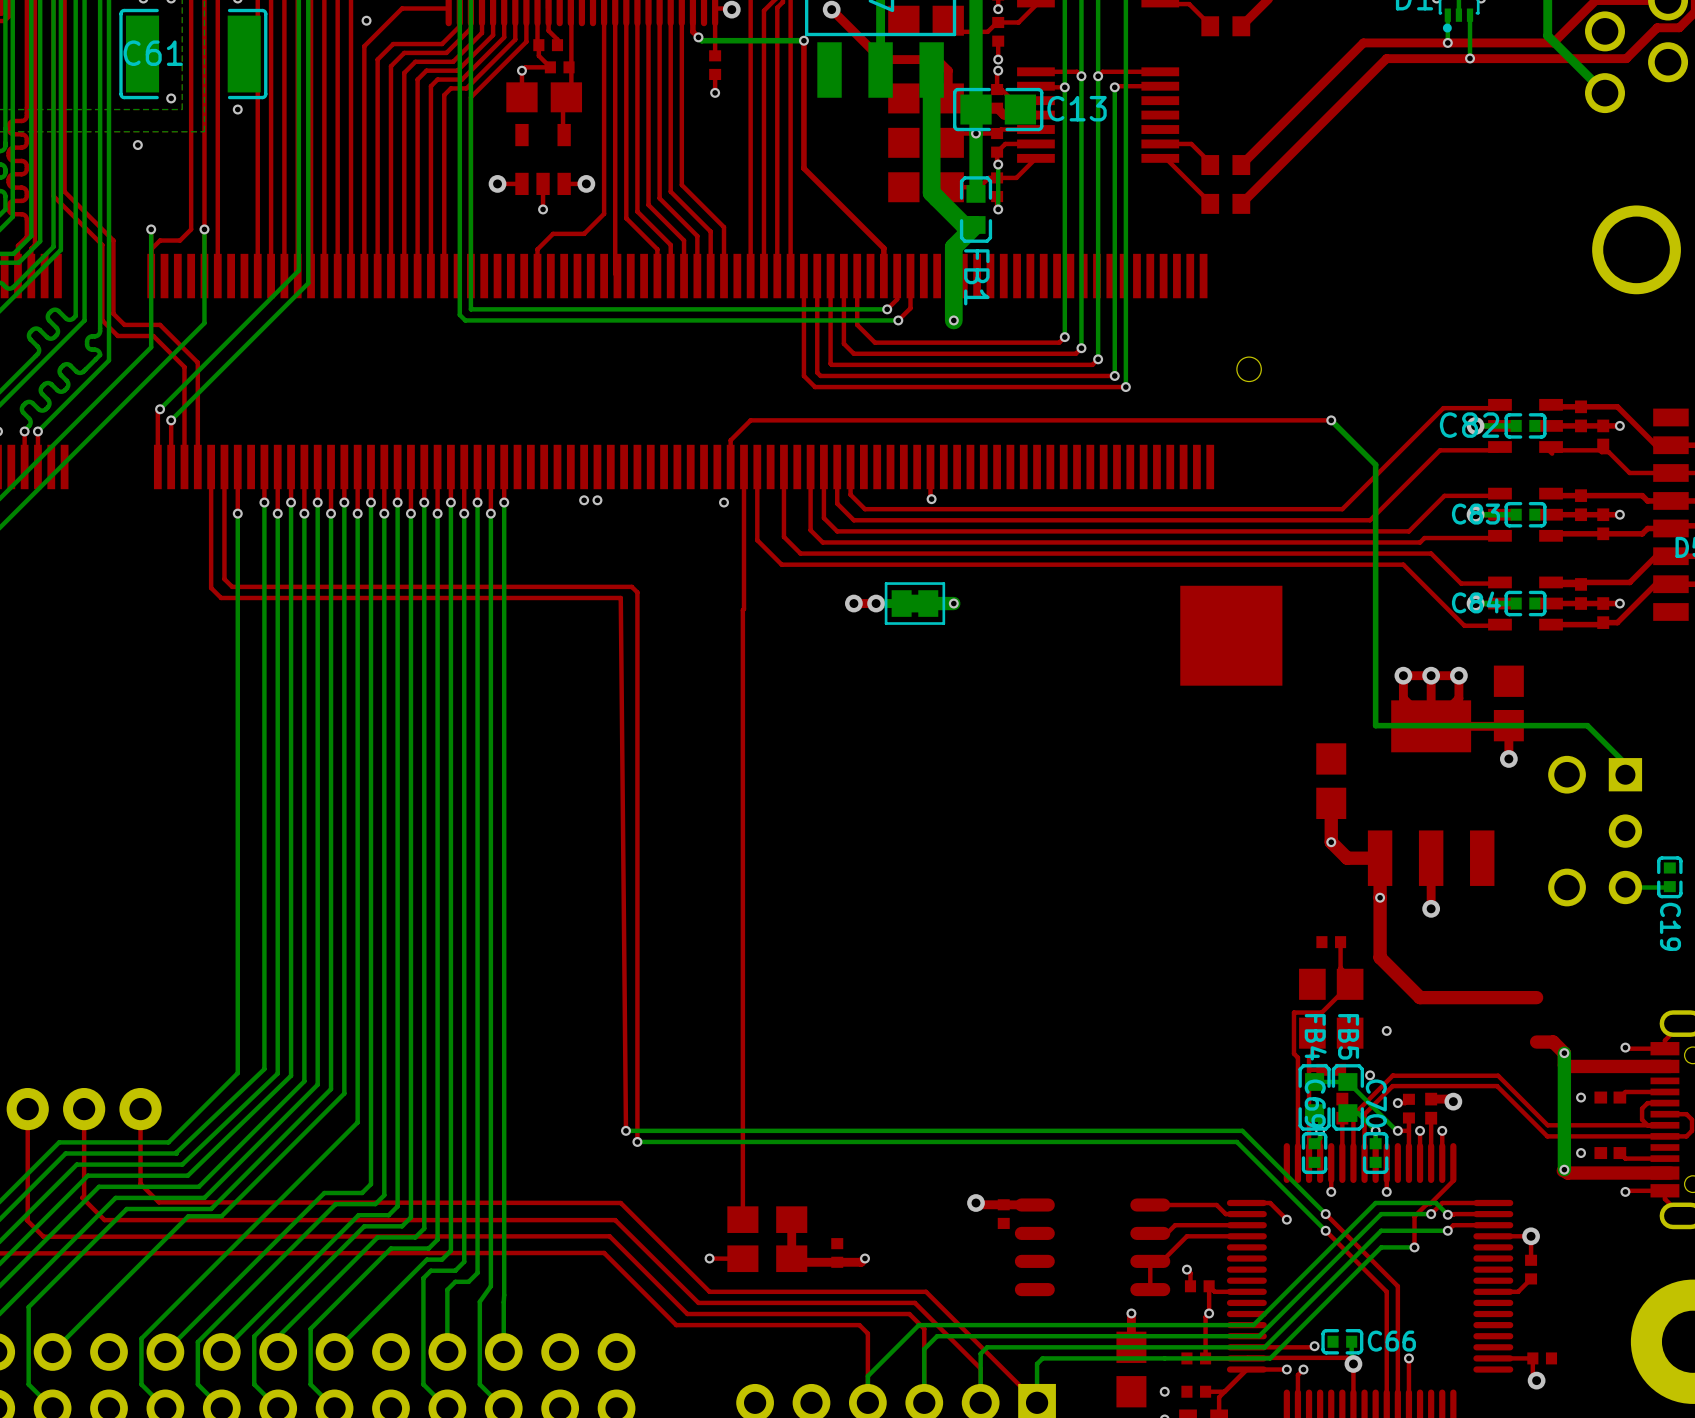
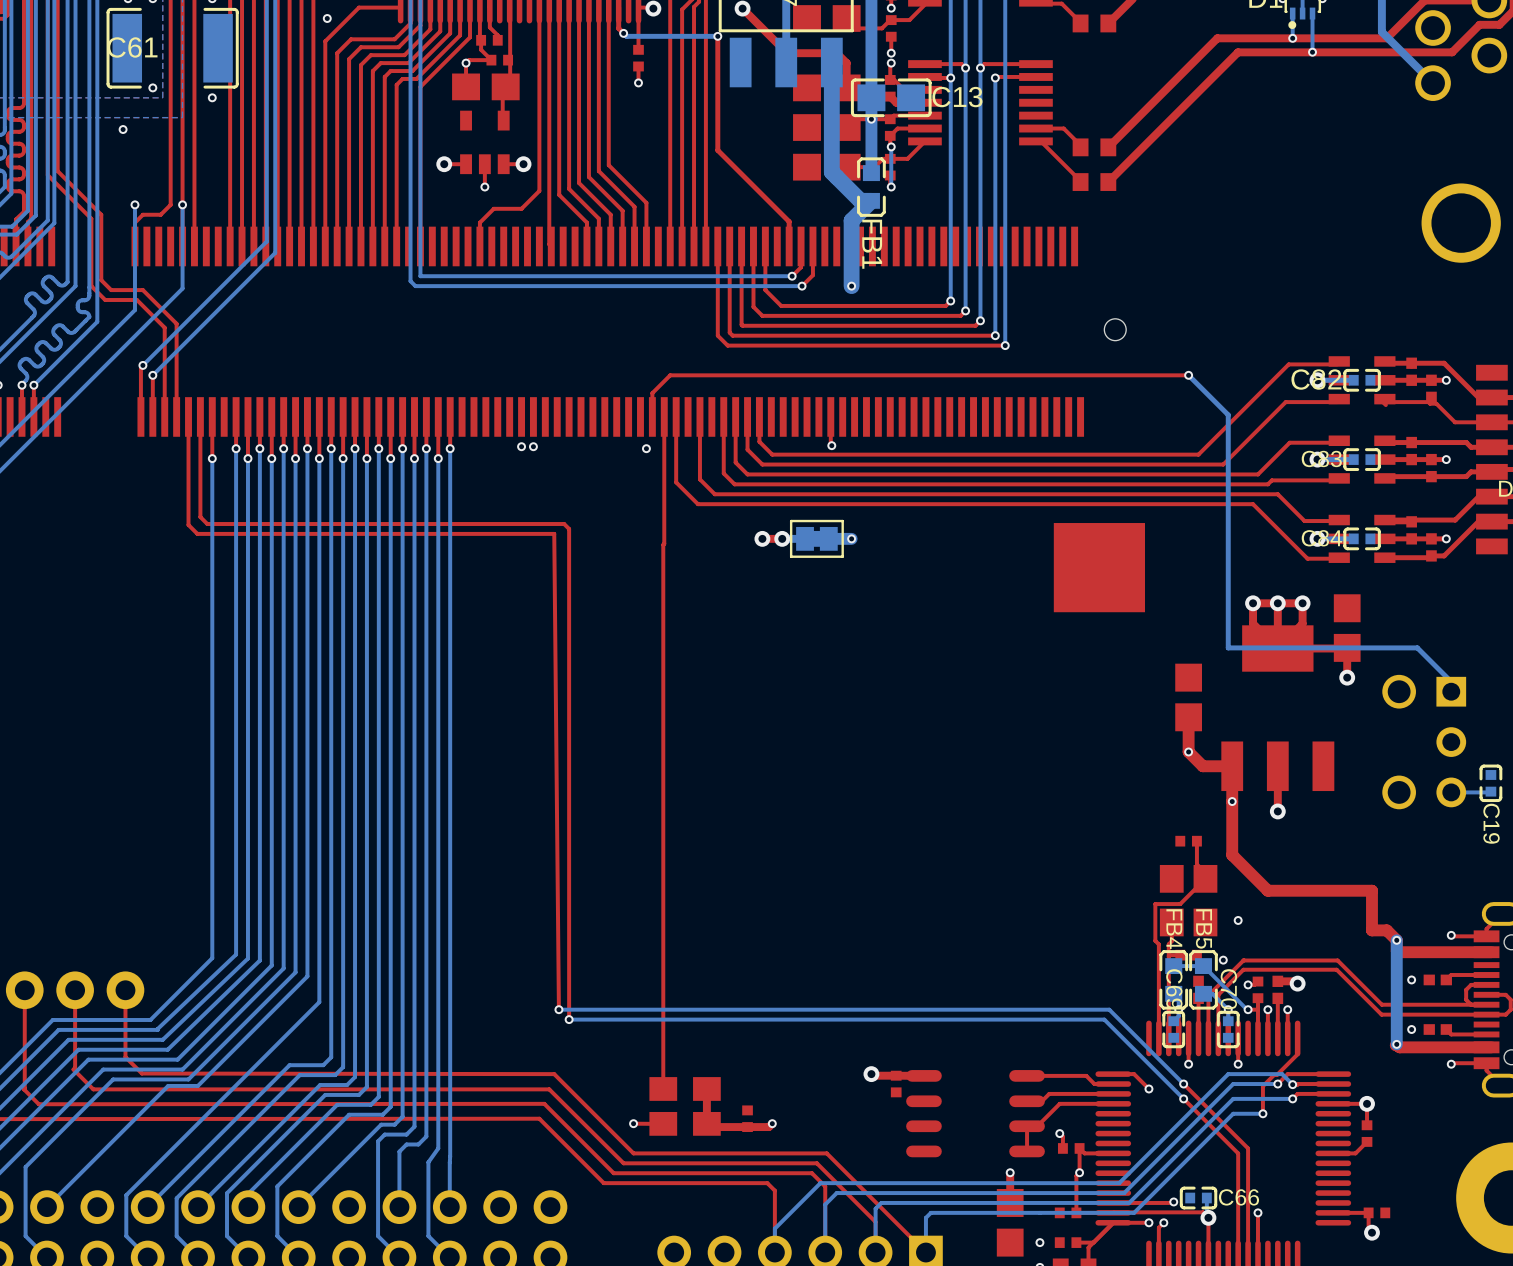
top track: none -> (1371, 890) (1371, 930)

